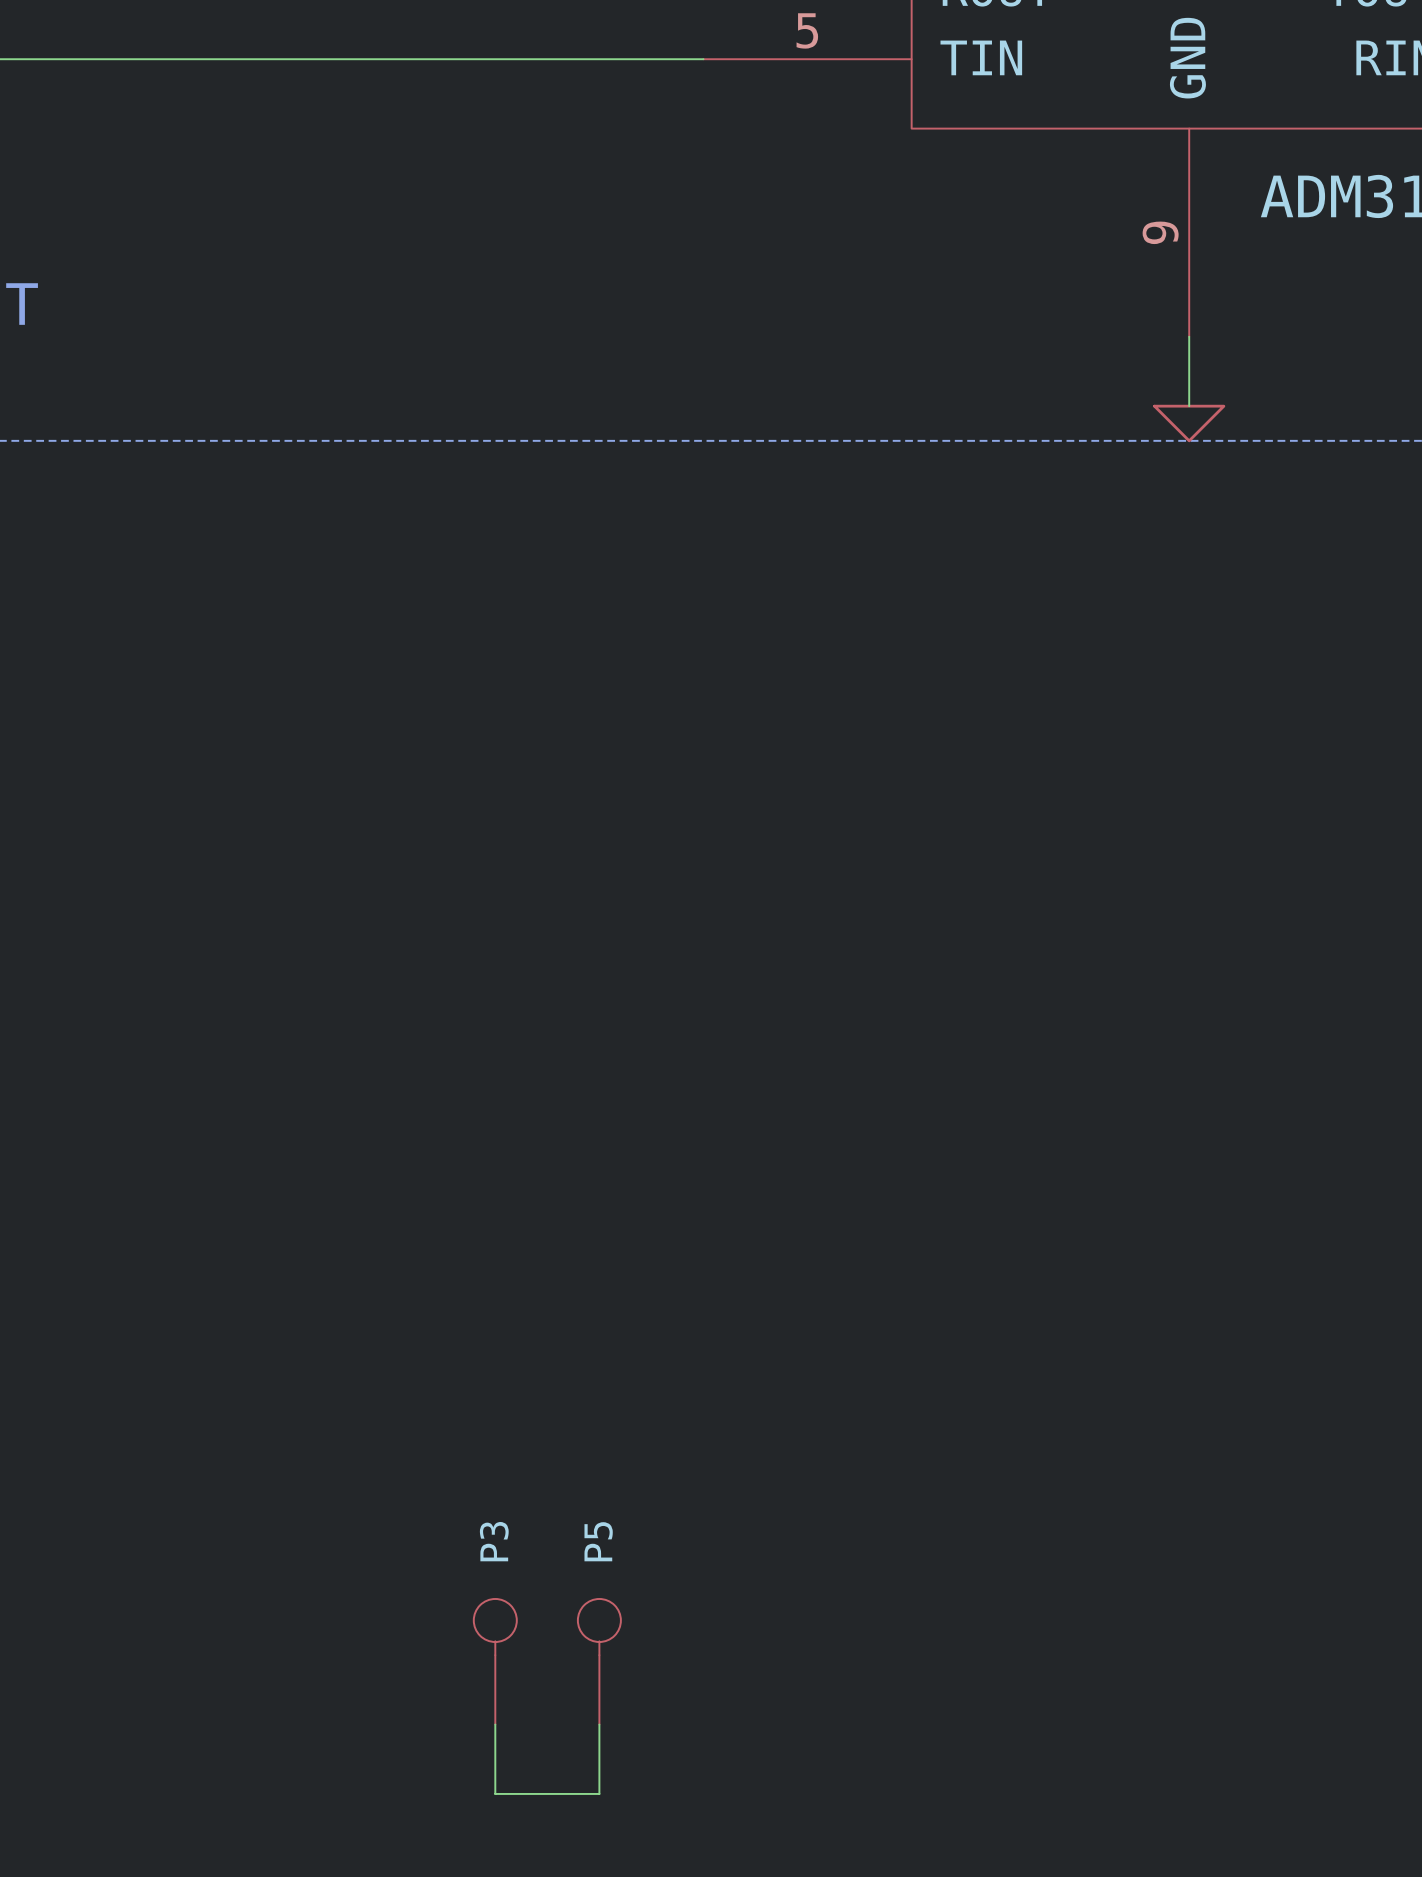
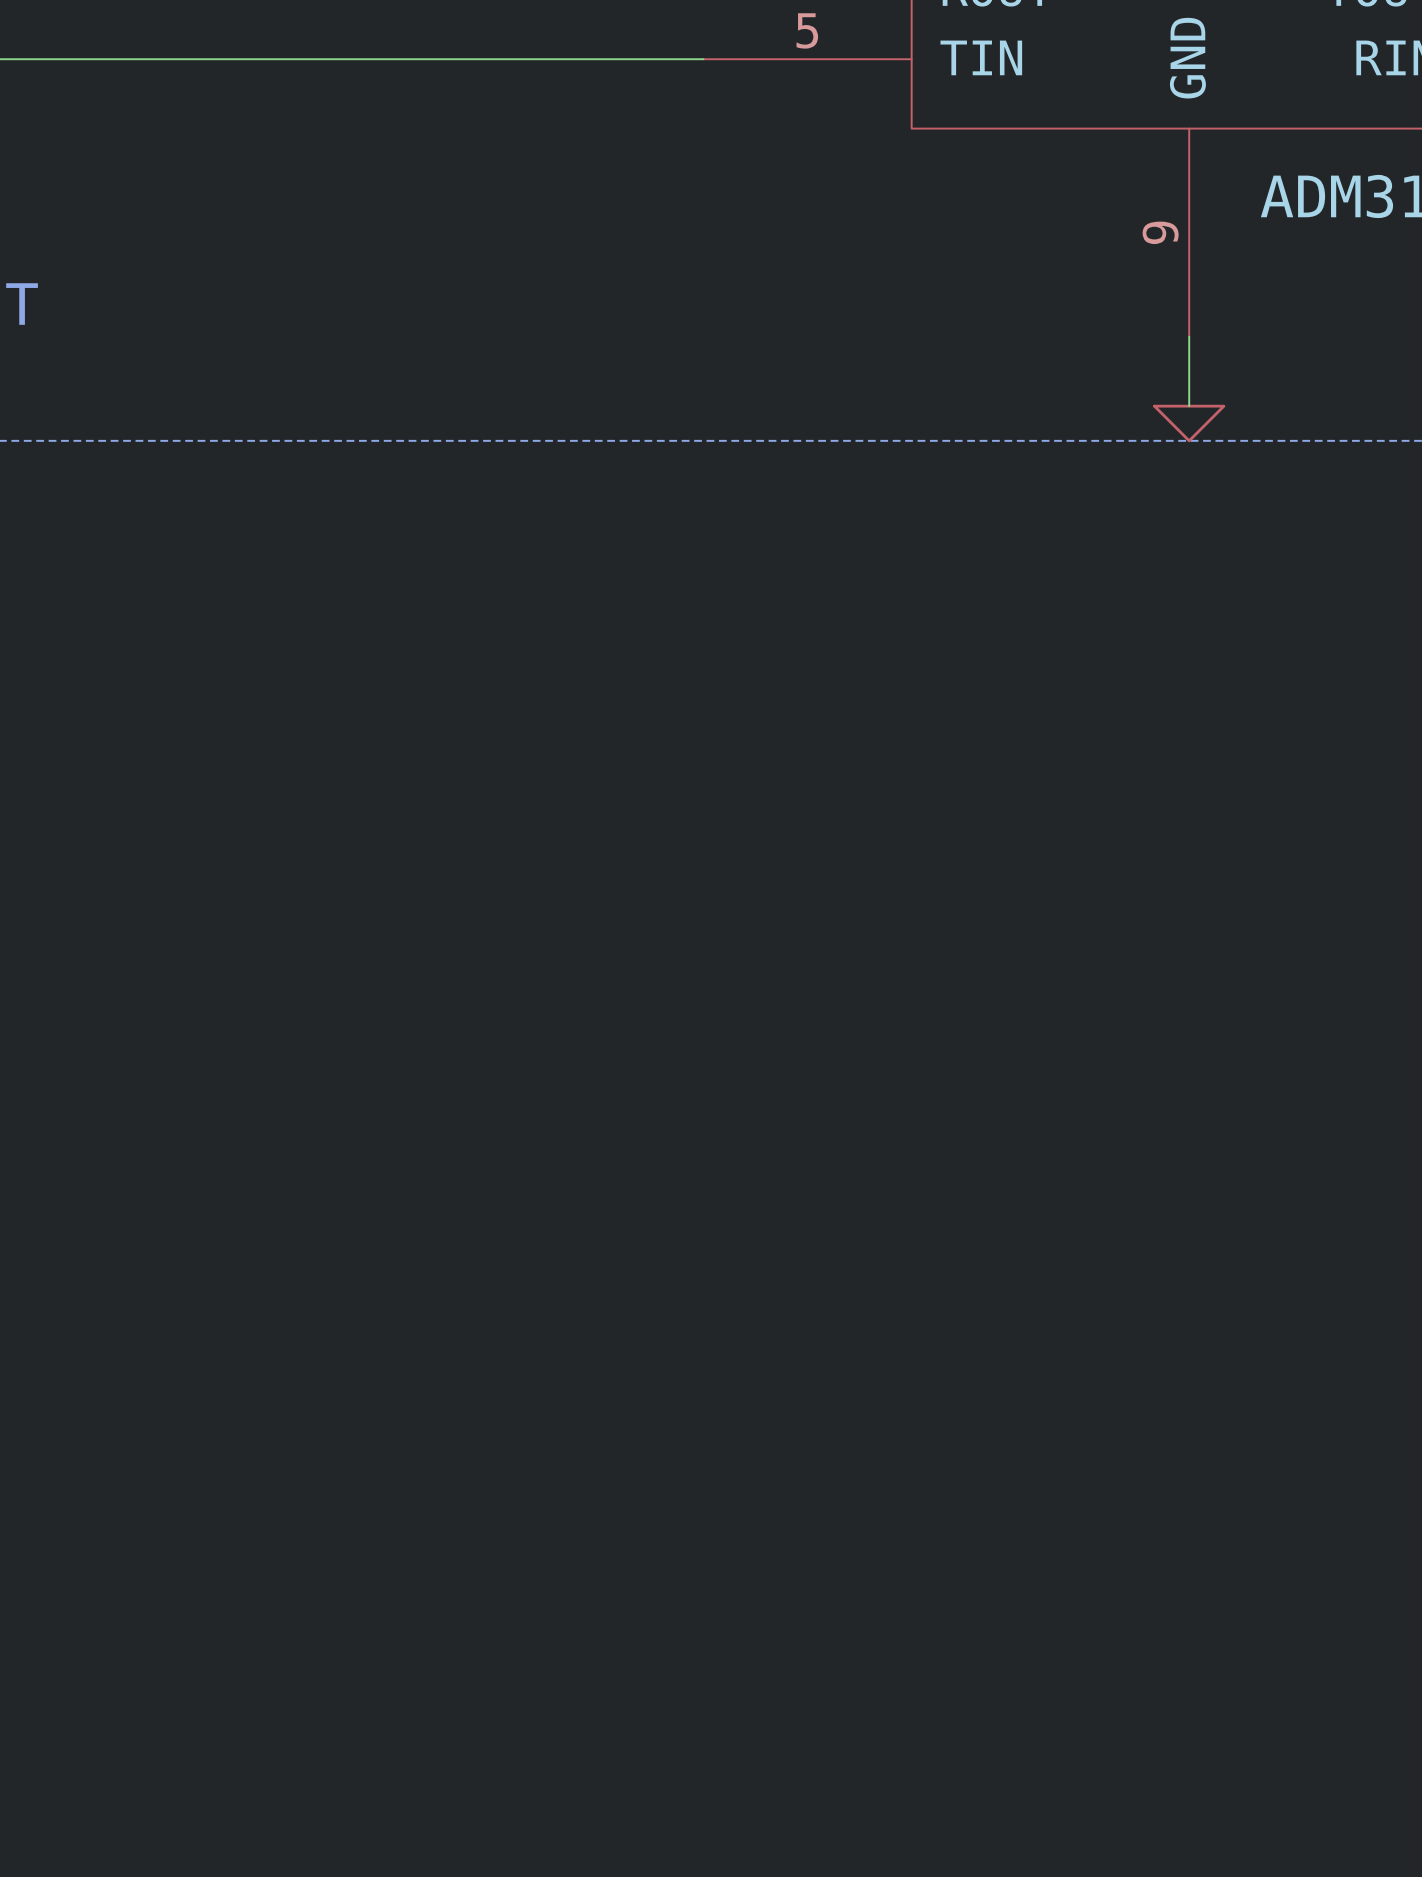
P3: (495, 1661) -> none
P5: (599, 1661) -> none
wire: (495, 1724) (495, 1793) (599, 1793) (599, 1724) -> none

